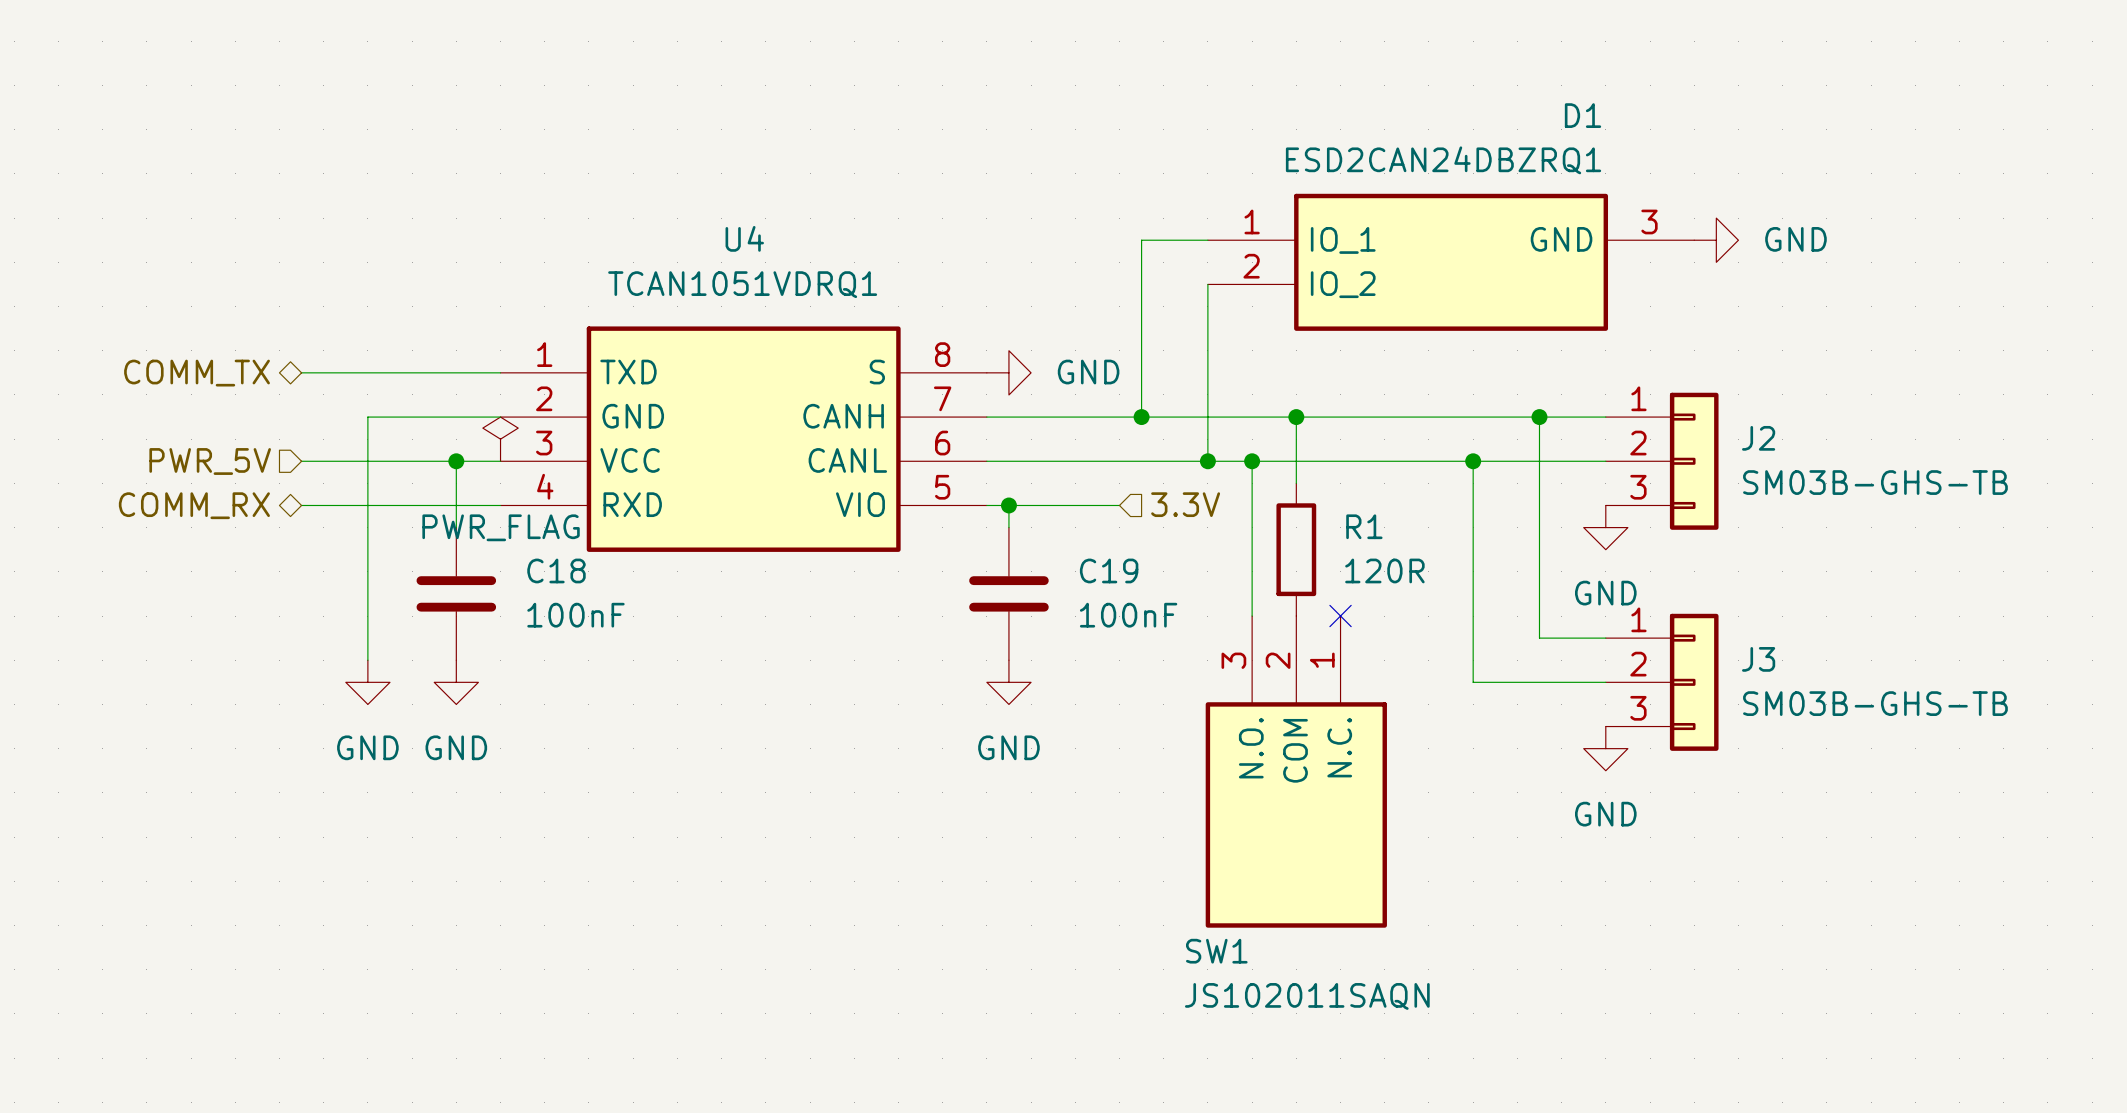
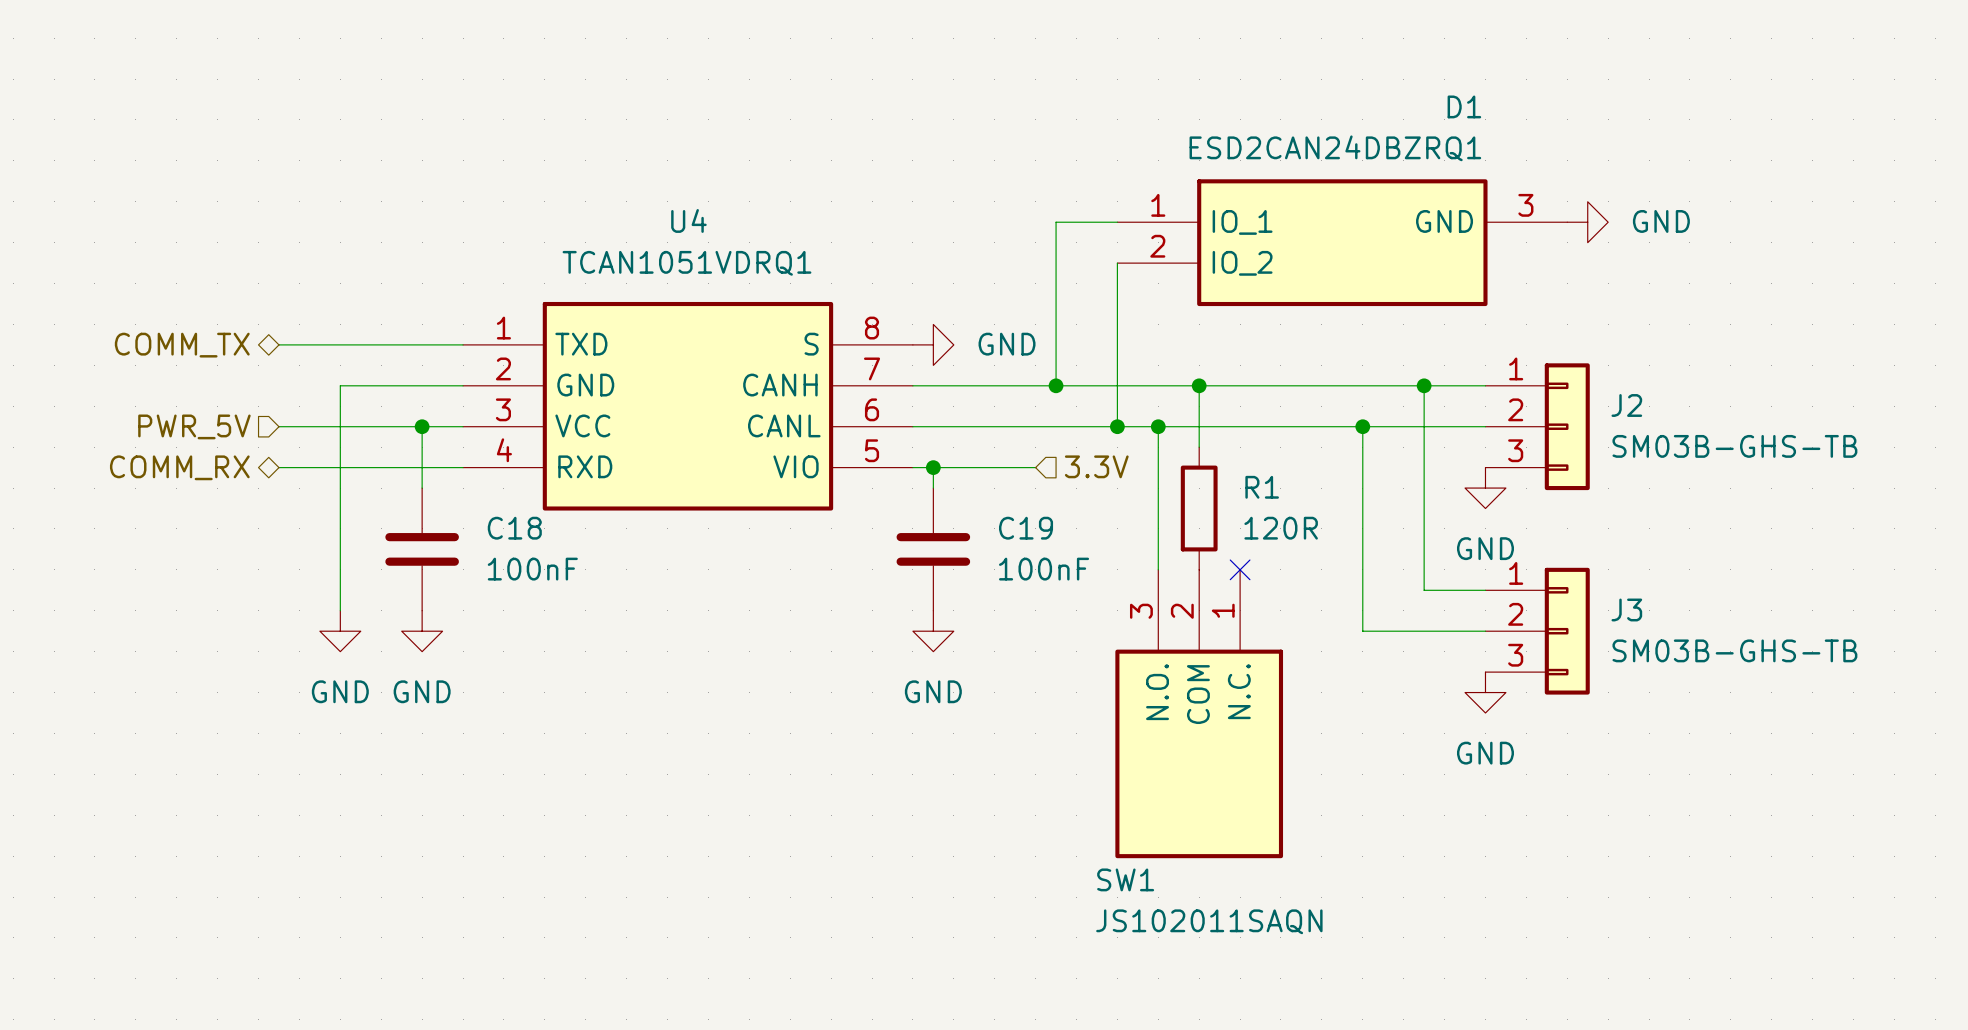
power symbol: PWR_FLAG (500, 439) -> none

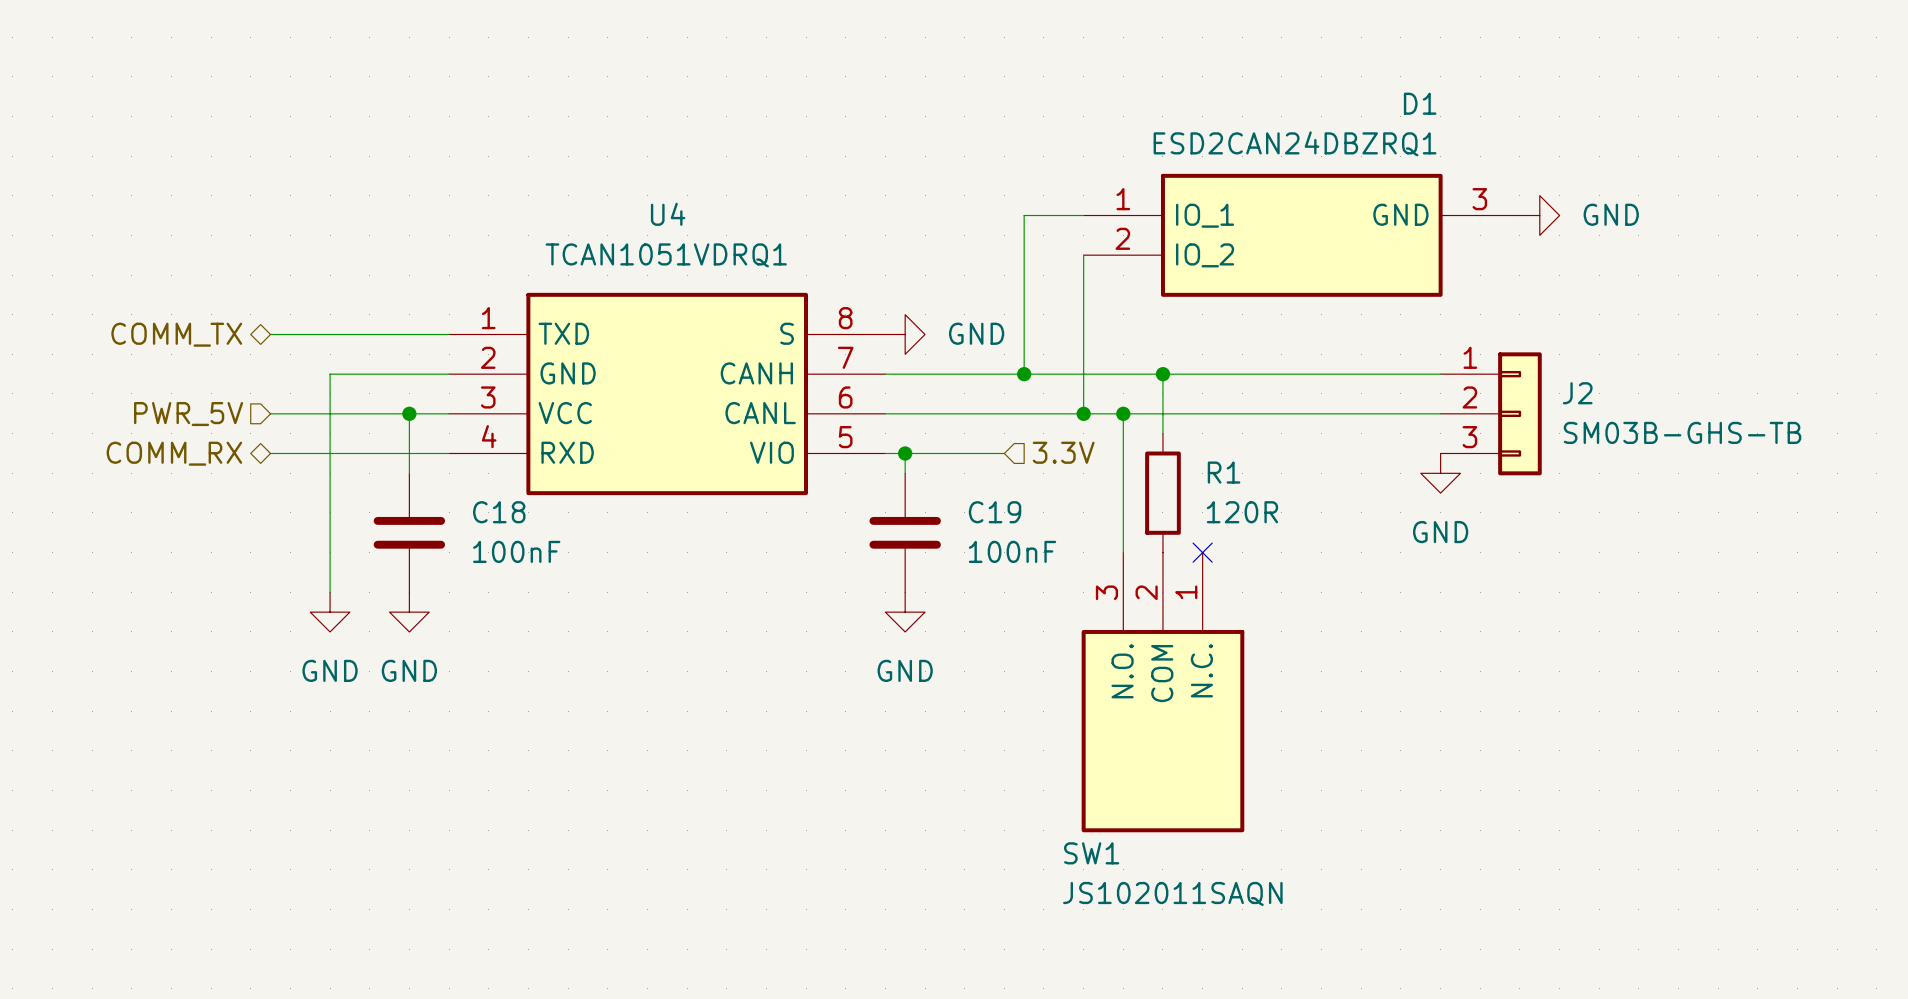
wire: (1424, 385) (1424, 590) (1485, 590) -> none
junction: (1424, 385) -> none
wire: (1362, 426) (1362, 631) (1485, 631) -> none
junction: (1362, 426) -> none
J3: SM03B-GHS-TB (1537, 631) -> none
power symbol: GND (1485, 692) -> none

